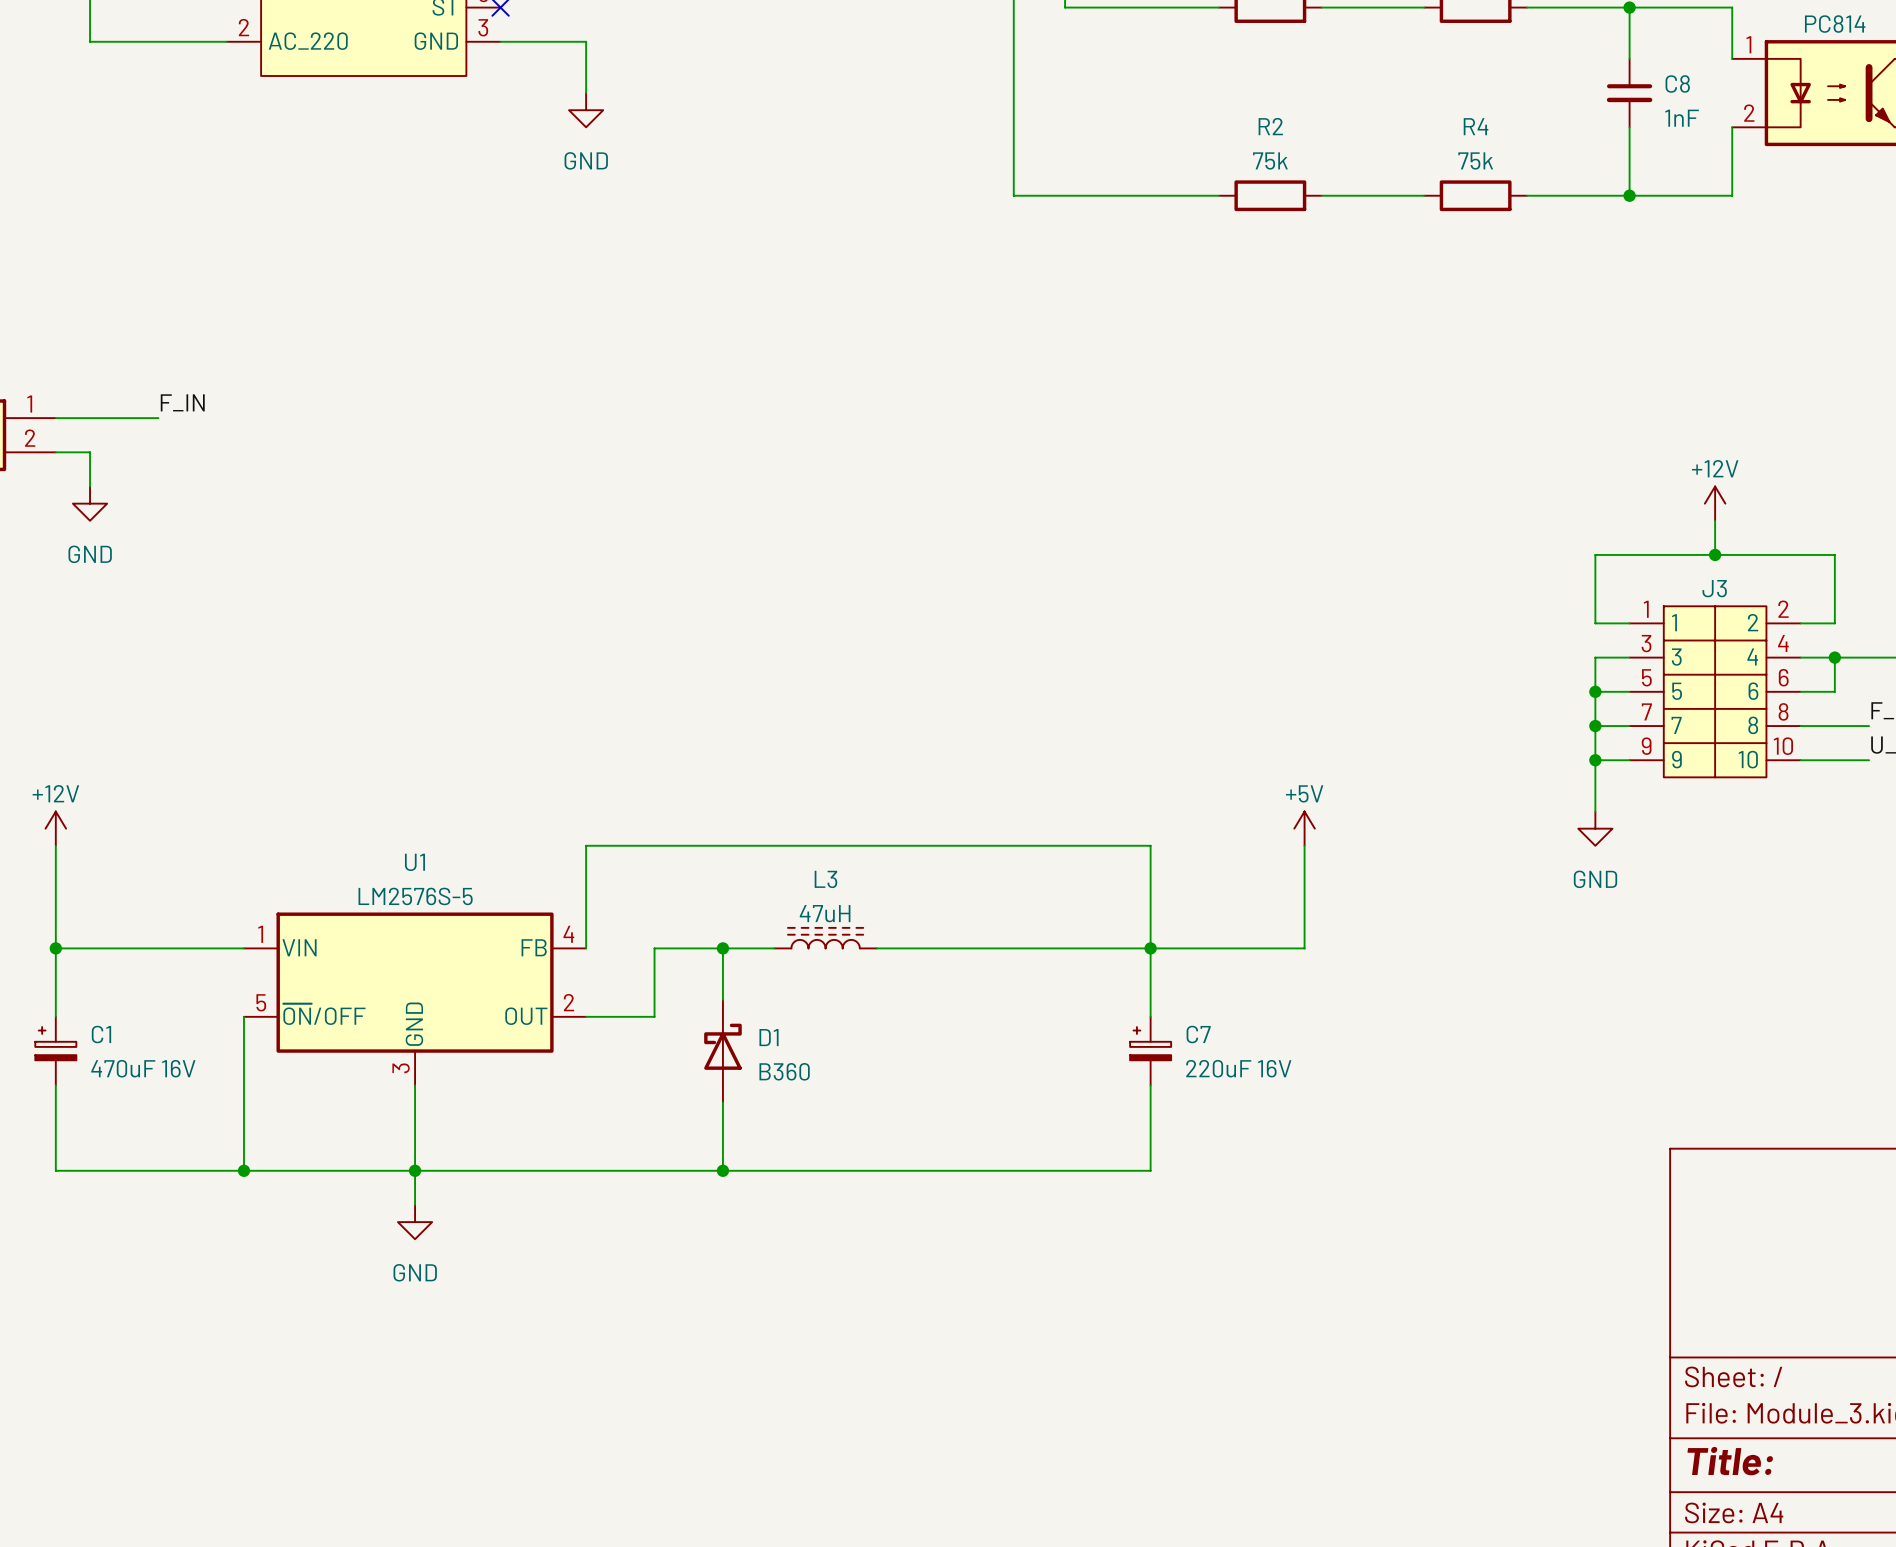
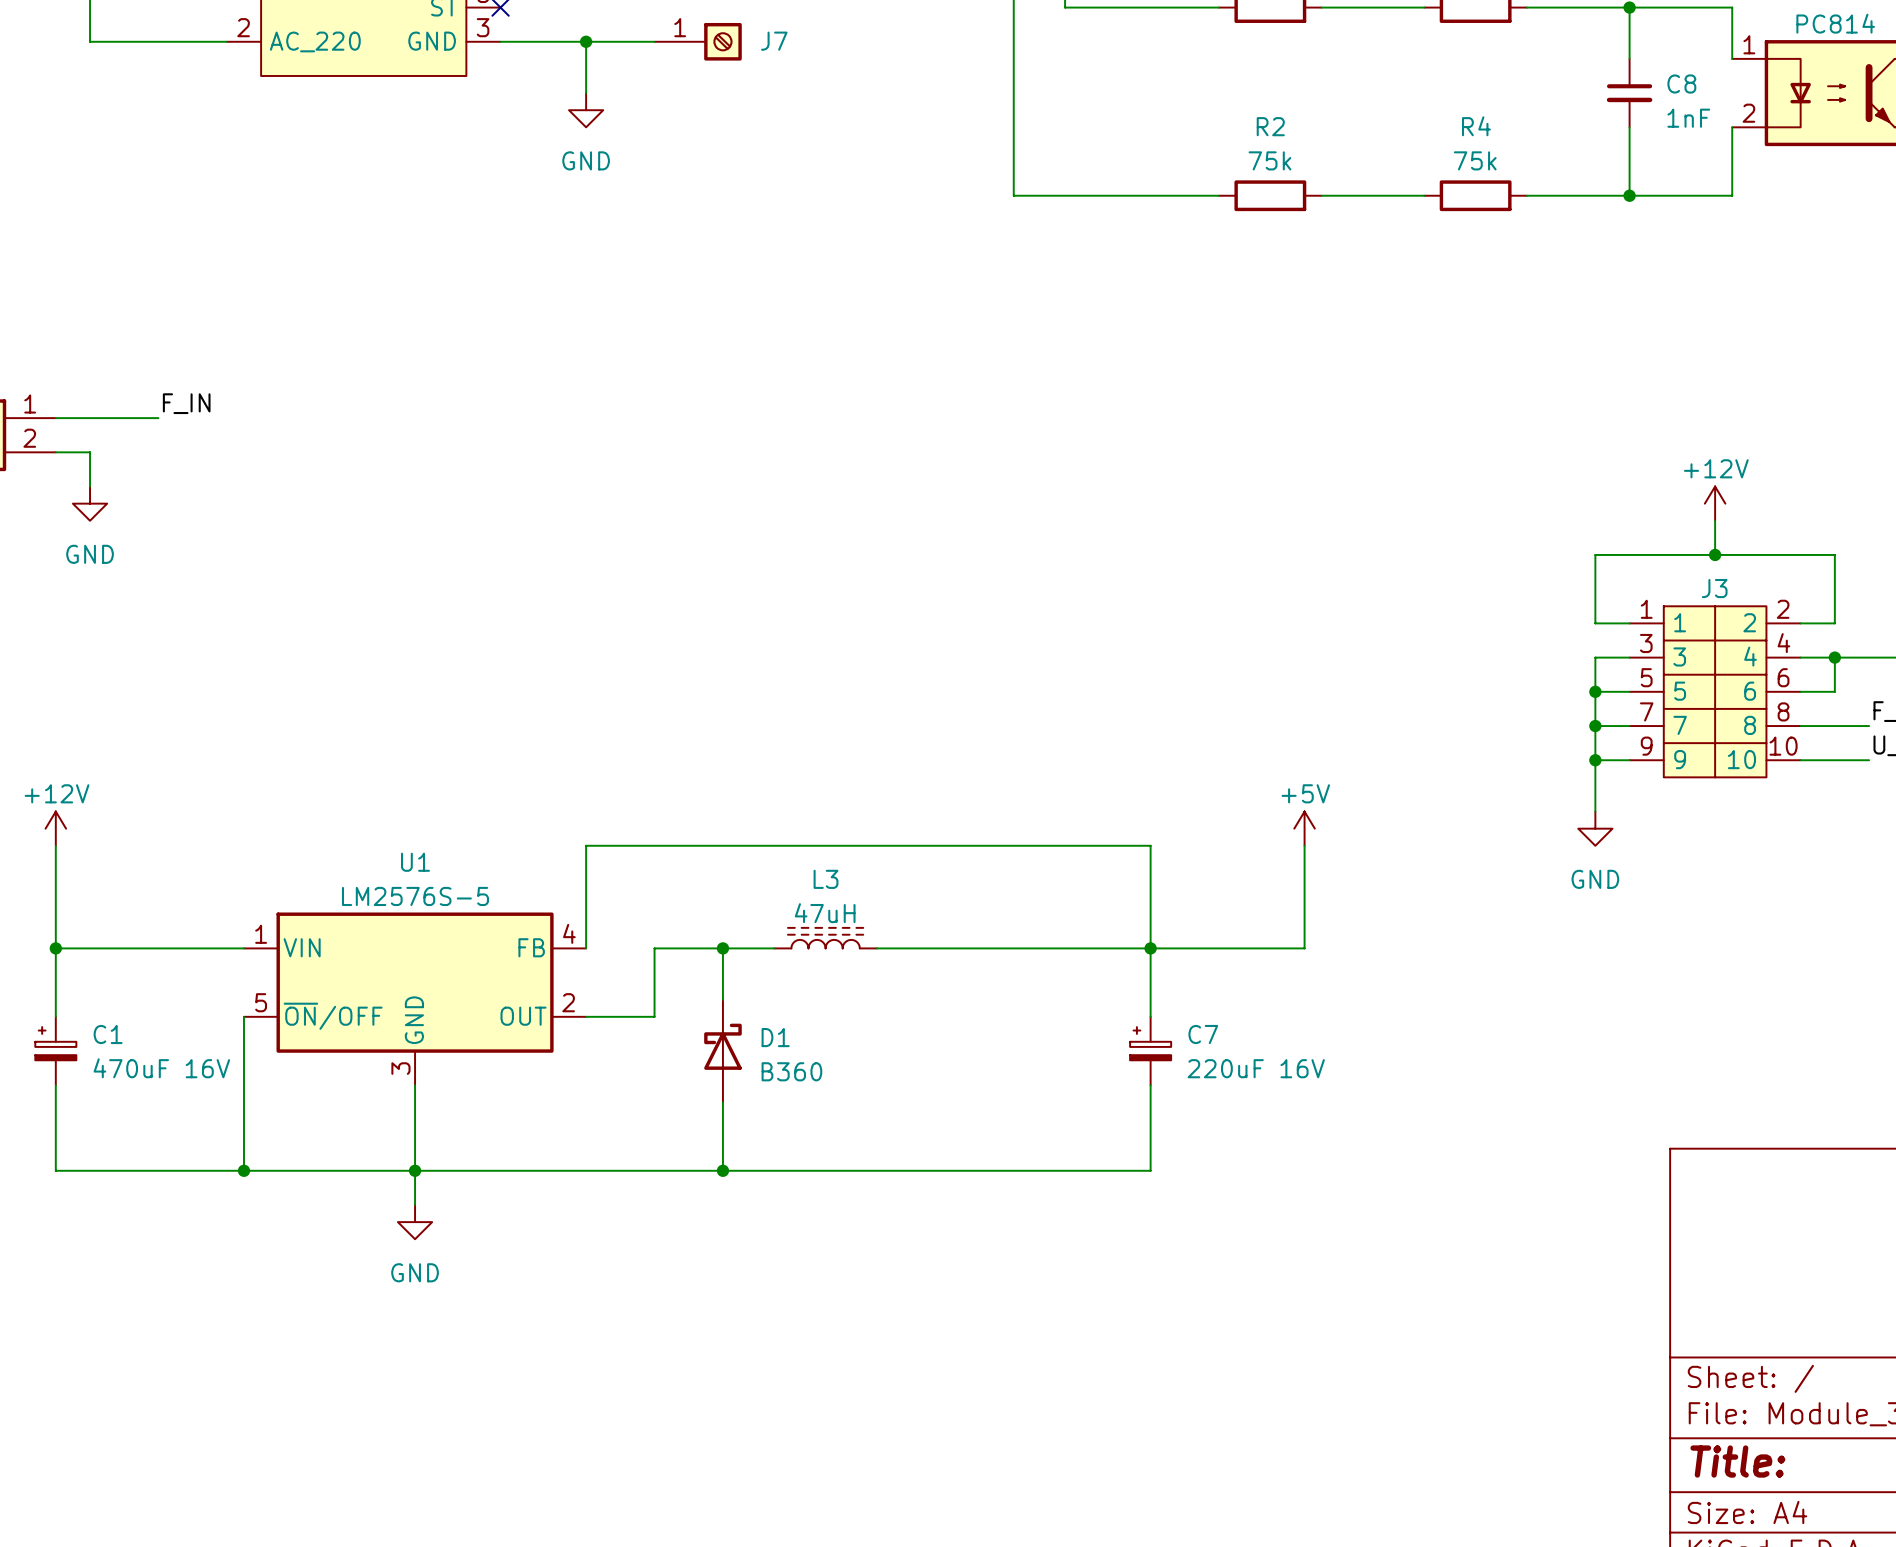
wire: none -> (586, 41) (654, 41)
junction: none -> (586, 41)
J7: none -> (698, 41)

